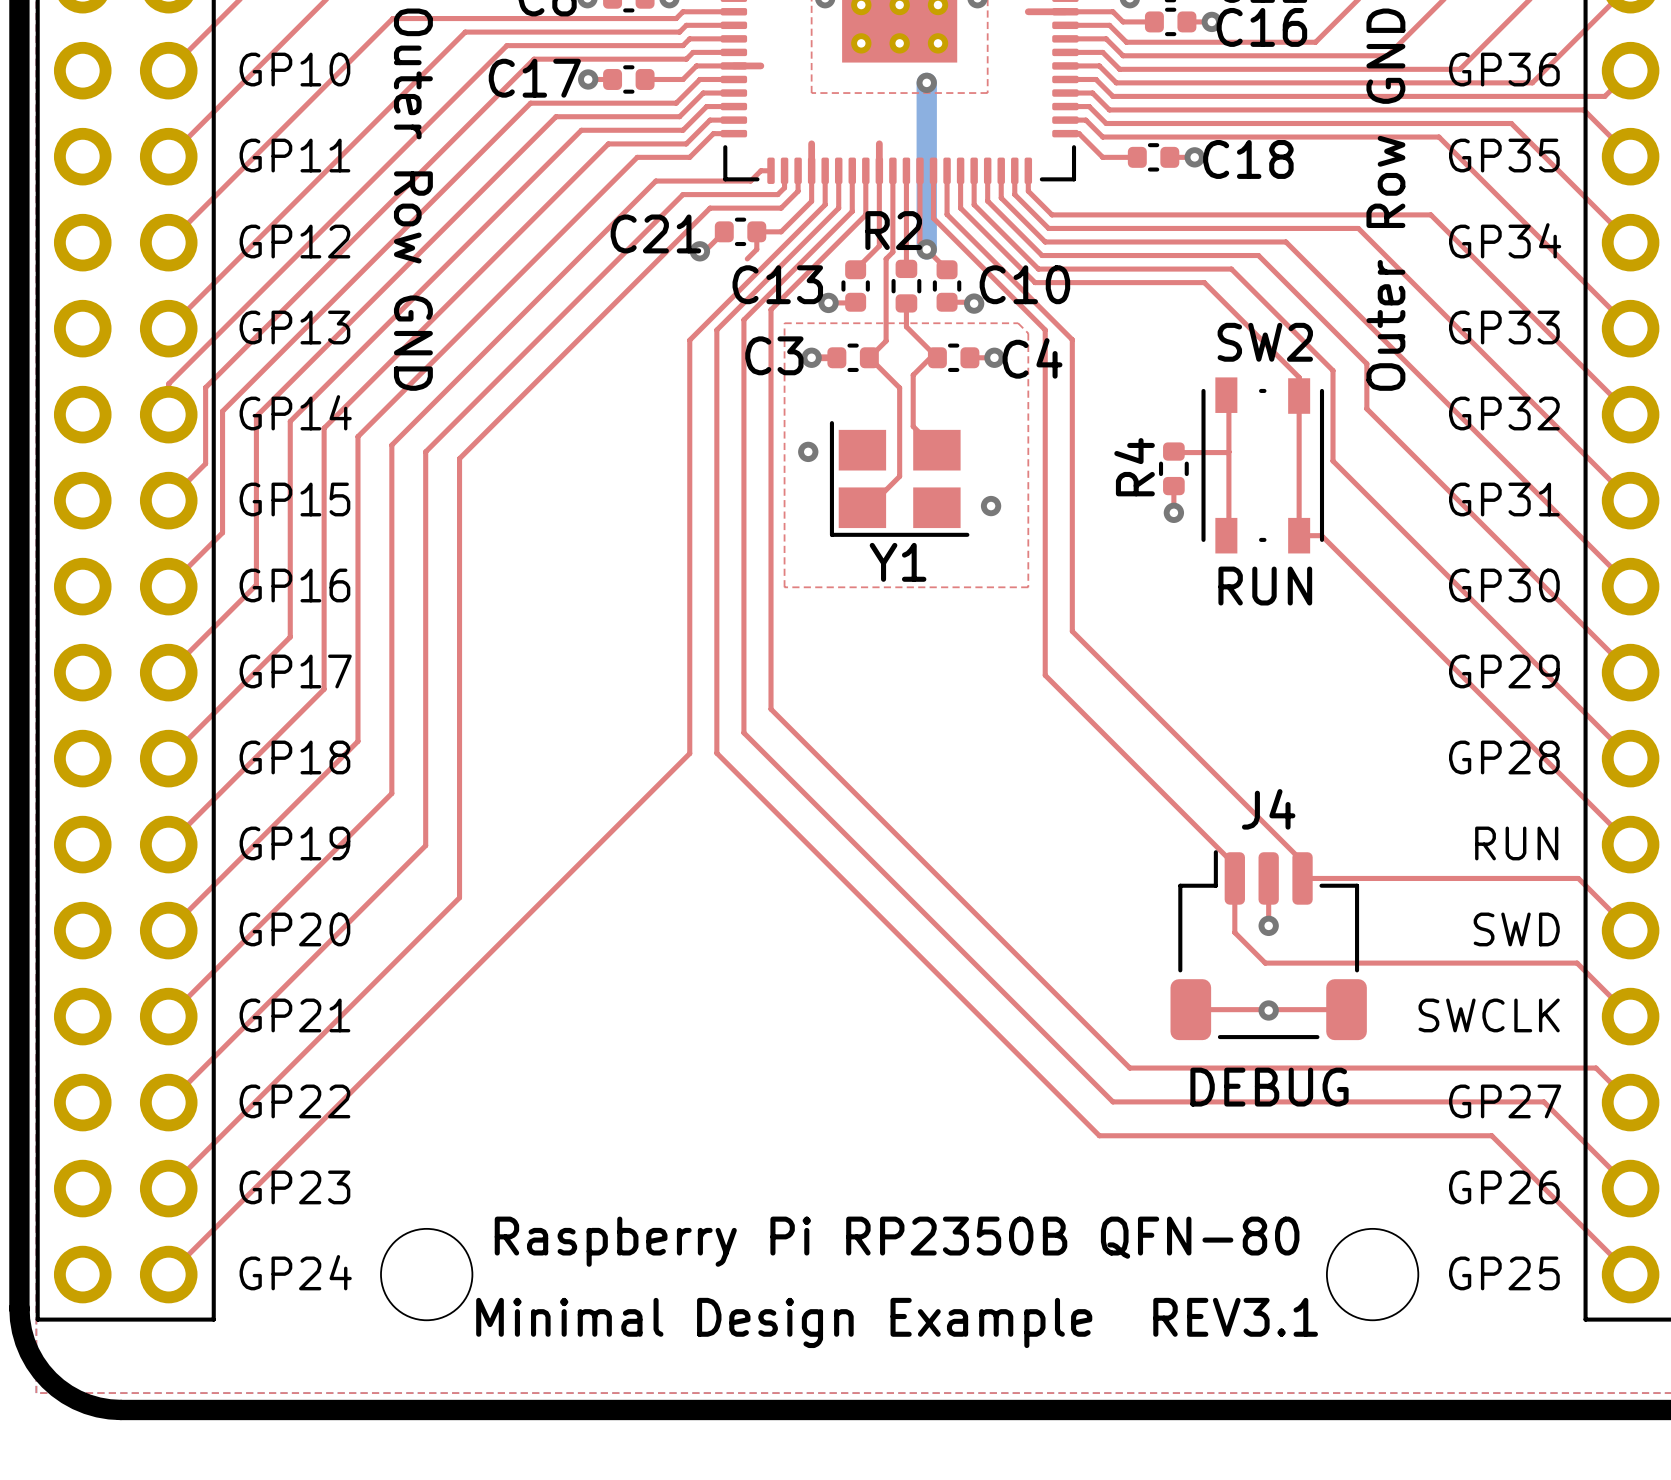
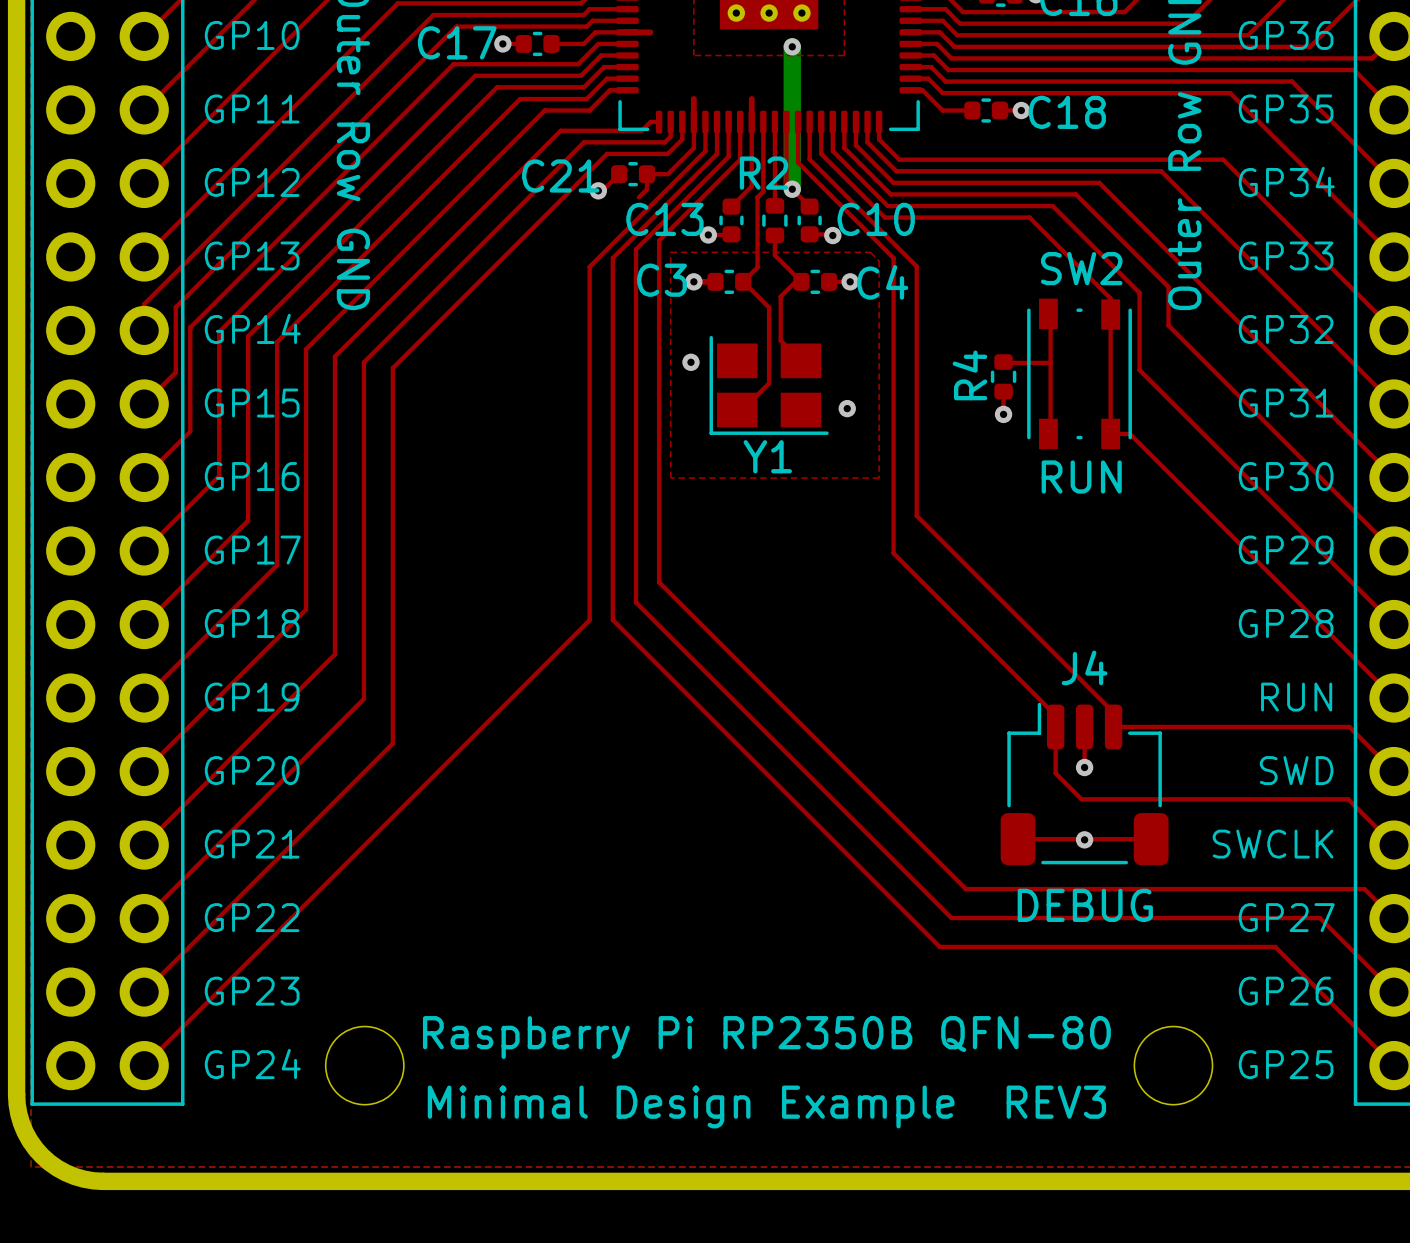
text: Minimal Design Example REV3.1 (897, 1322) -> Minimal Design Example REV3 (766, 1106)

